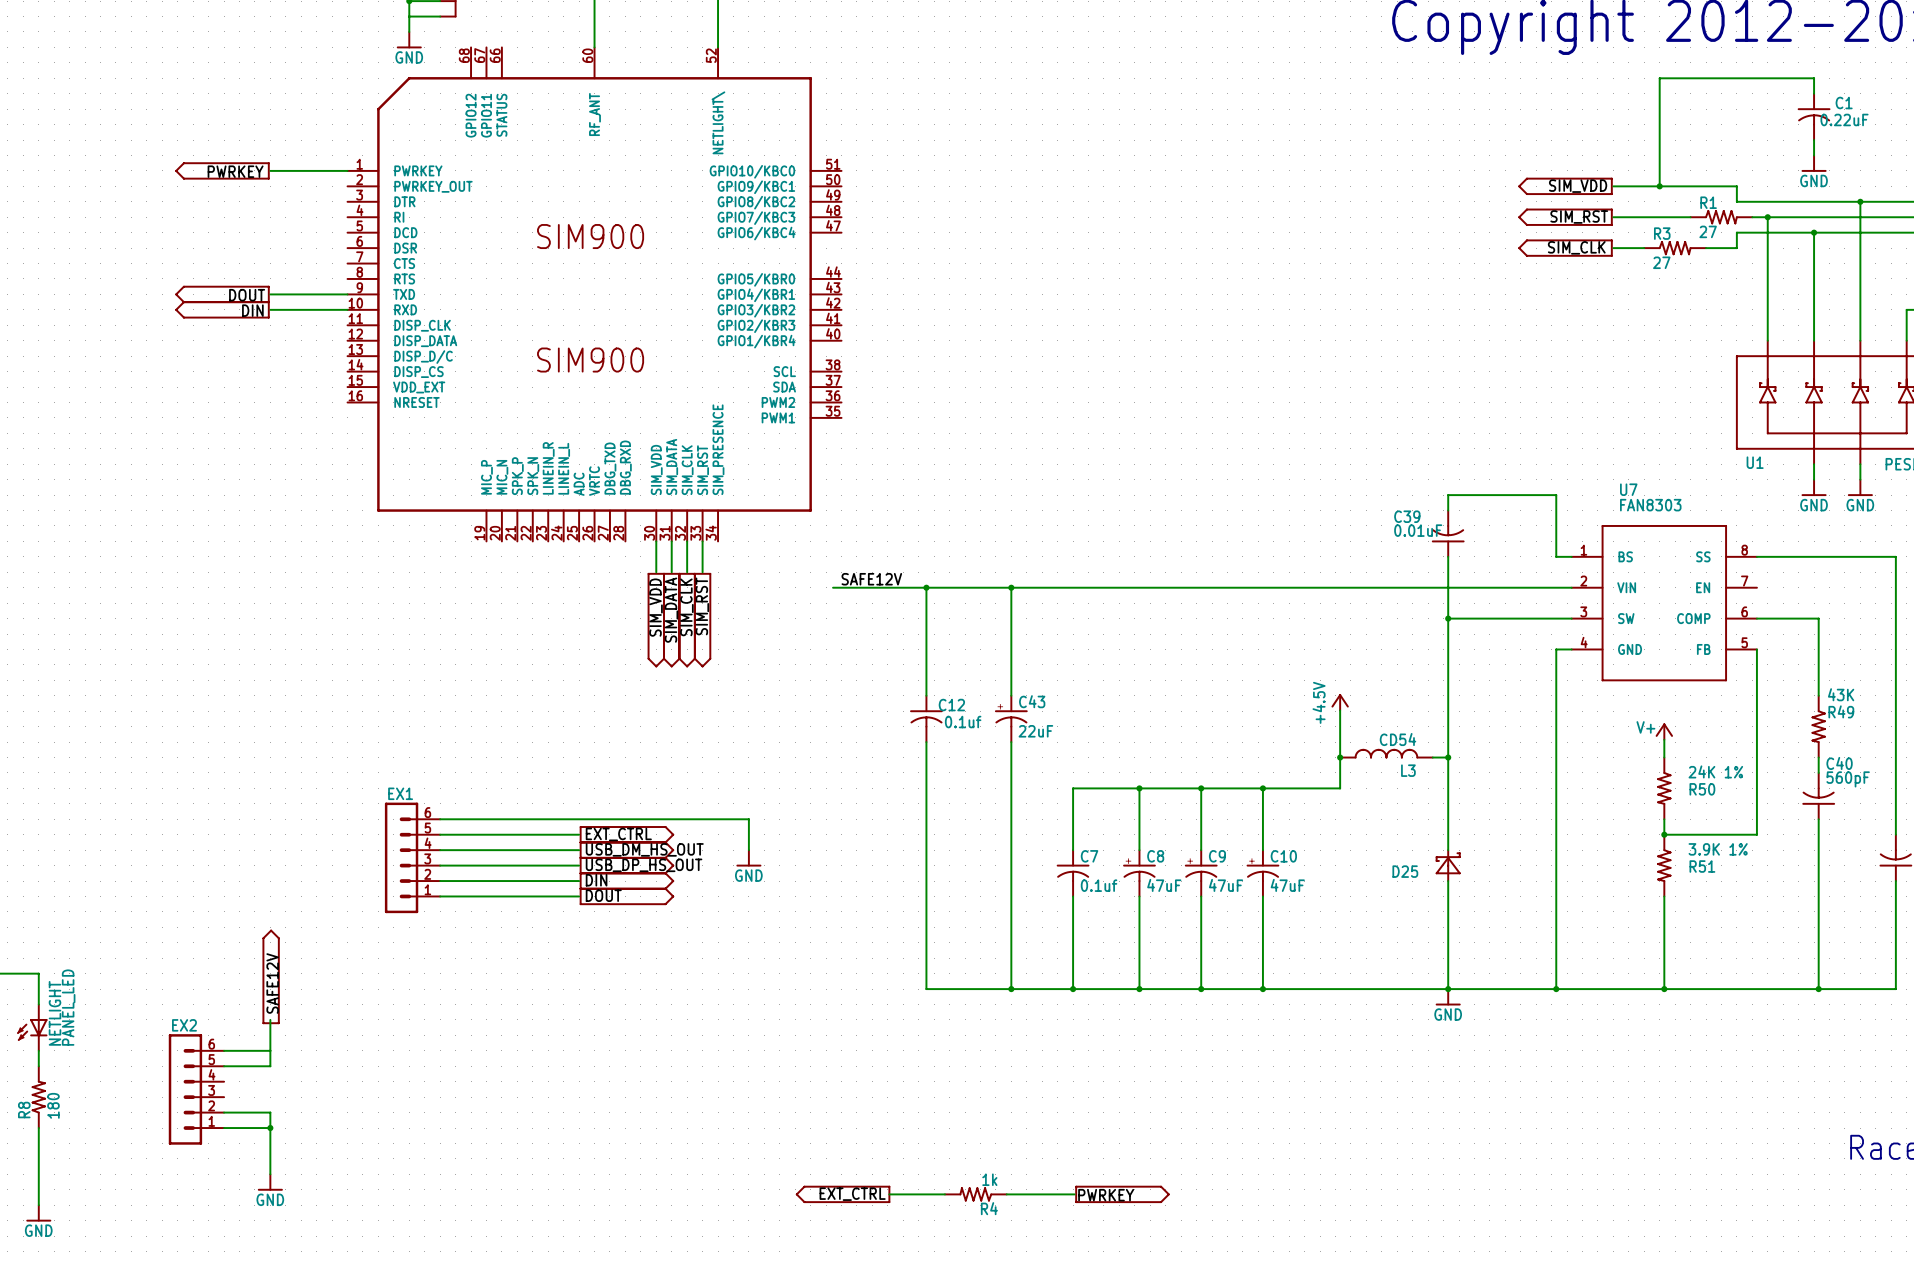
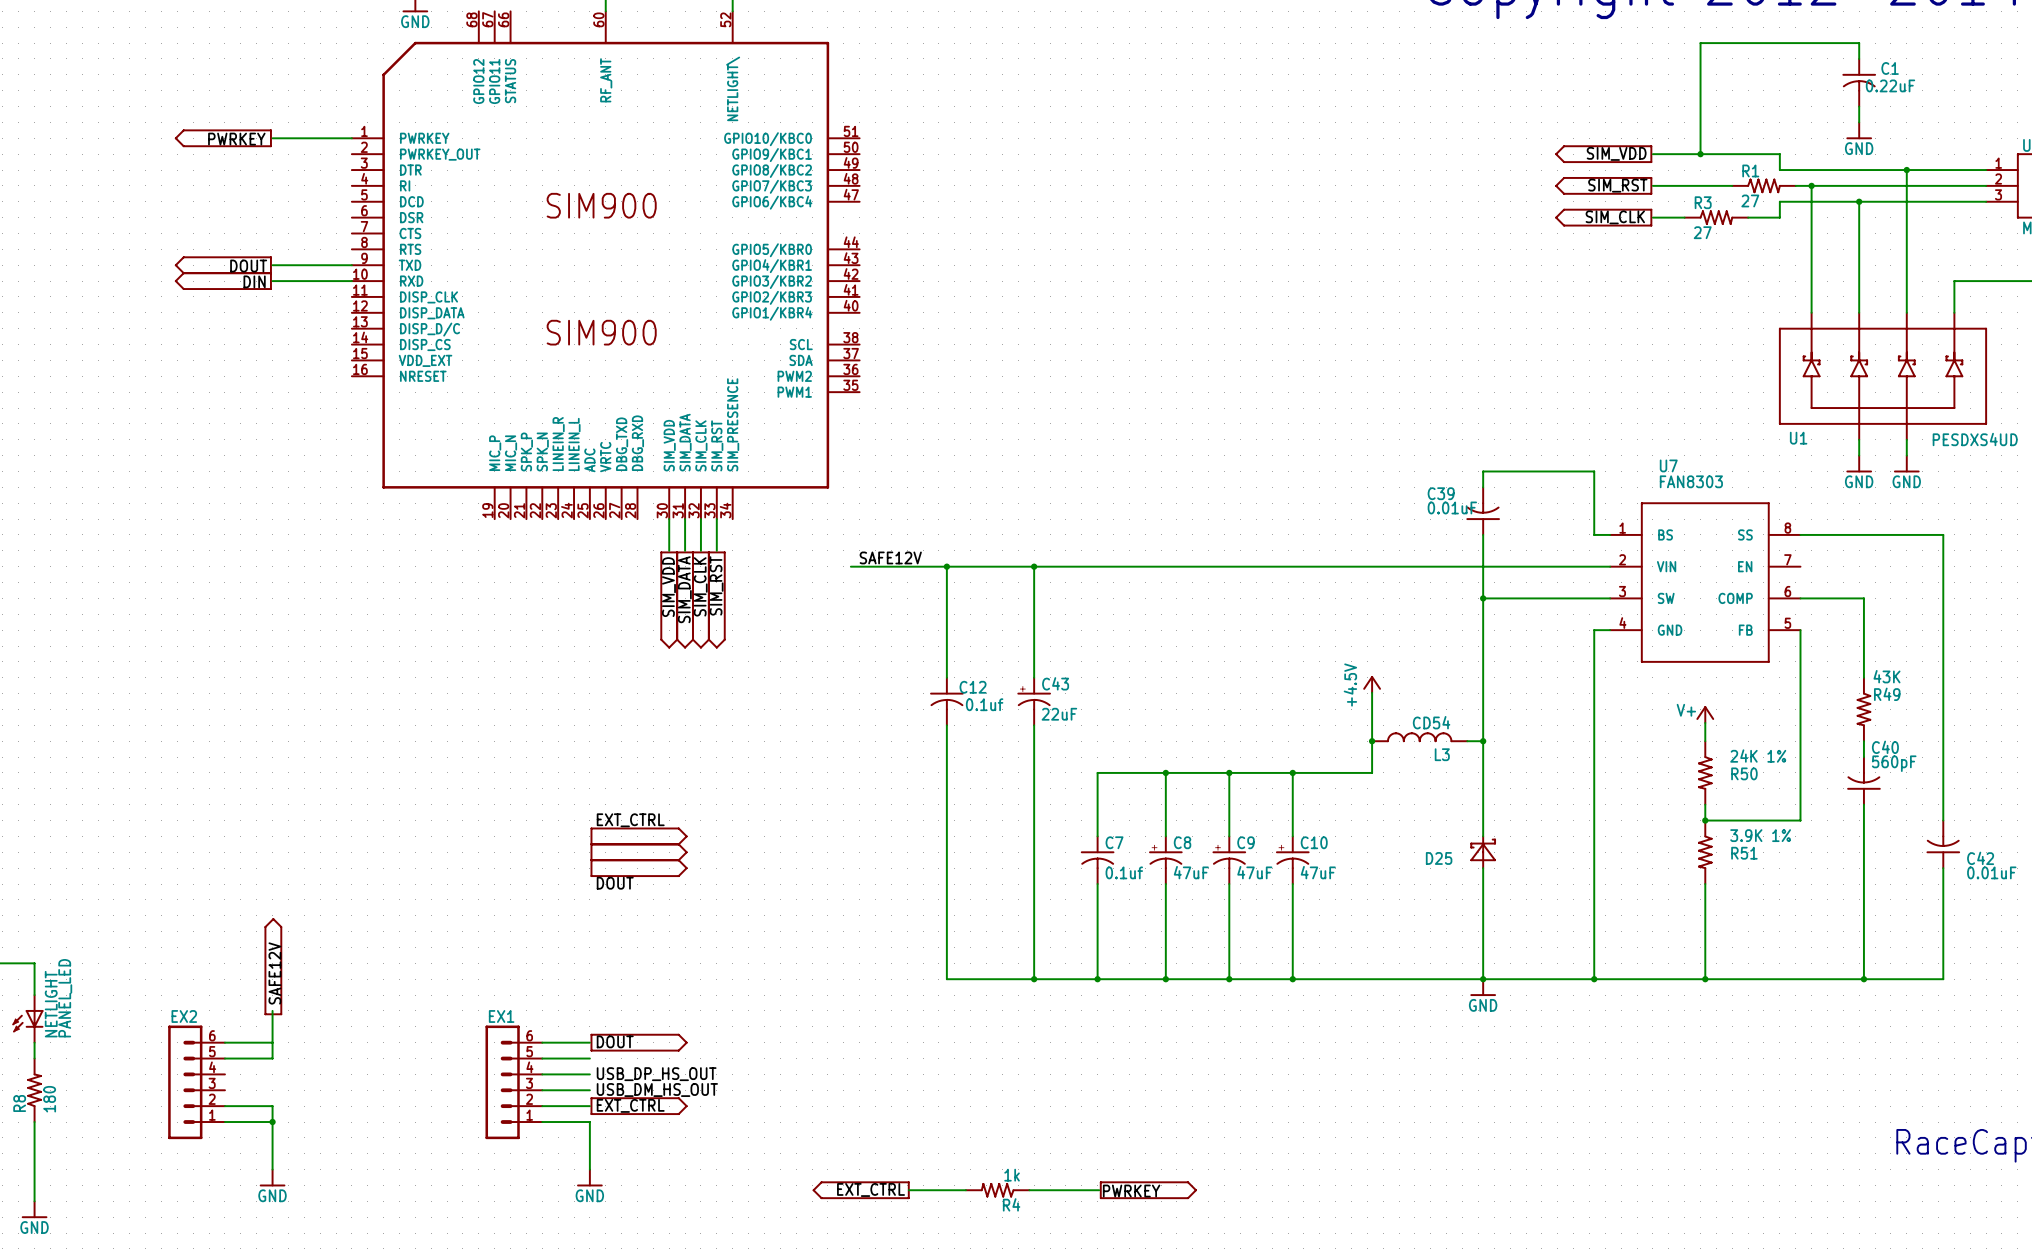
wire: (440, 819) (748, 819) (748, 850) -> none
wire: (440, 834) (579, 834) -> none
part: (626, 834) -> none
label: USB_DM_HS_OUT (644, 849) -> none
wire: (440, 850) (579, 850) -> none
EX1 position: (412, 857) -> (513, 1082)
power symbol: GND (748, 858) -> none
wire: (440, 865) (579, 865) -> none
label: USB_DP_HS_OUT (644, 865) -> none
label: DIN (596, 880) -> none
wire: (440, 881) (579, 881) -> none
wire: (440, 896) (579, 896) -> none
part: (626, 896) -> none
wire: none -> (542, 1042) (589, 1042)
label: none -> DOUT (615, 1041)
part: none -> (639, 1042)
wire: none -> (542, 1058) (589, 1058)
wire: none -> (542, 1074) (589, 1074)
label: none -> USB_DP_HS_OUT (656, 1074)
label: none -> USB_DM_HS_OUT (657, 1090)
wire: none -> (542, 1090) (589, 1090)
wire: none -> (542, 1106) (589, 1106)
label: none -> EXT_CTRL (630, 1105)
part: none -> (639, 1106)
wire: none -> (542, 1122) (589, 1122) (589, 1169)
power symbol: none -> GND (589, 1177)

